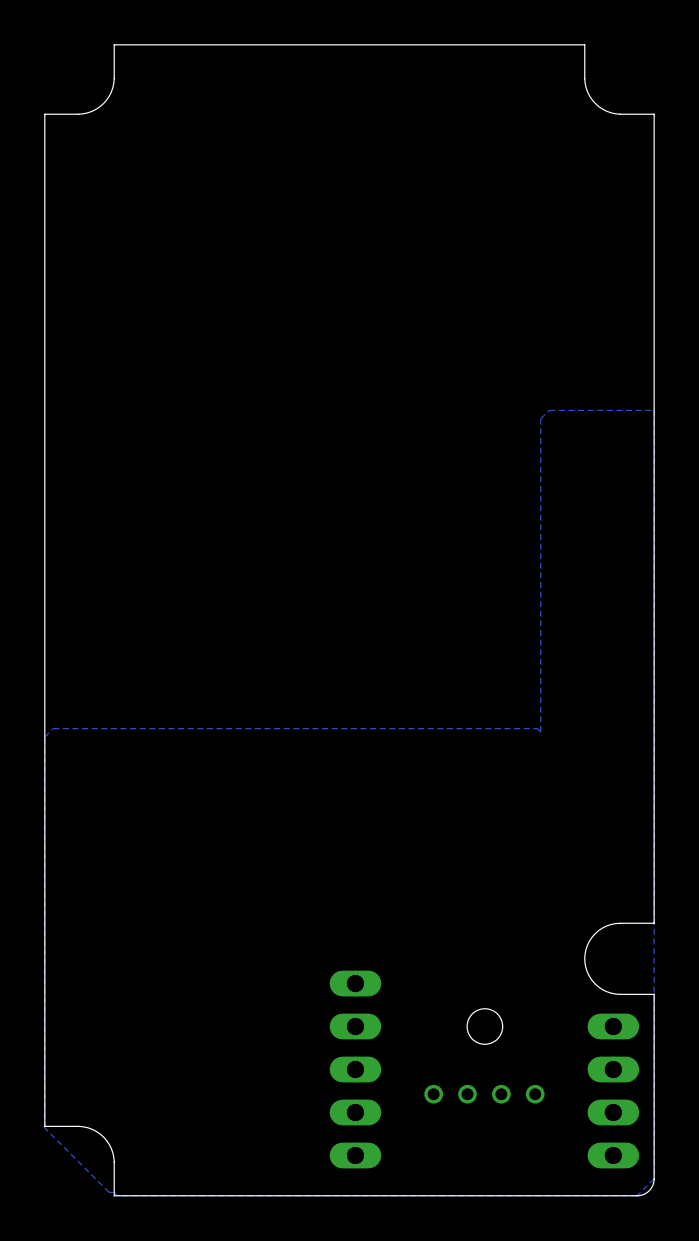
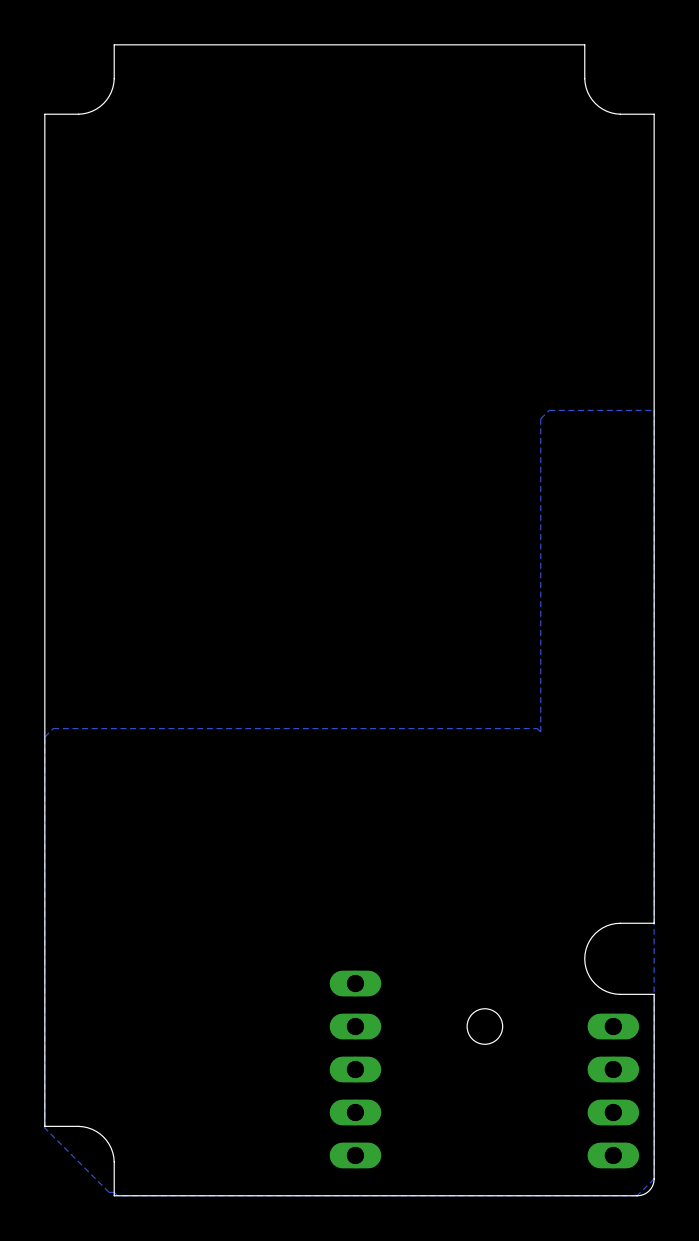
via: (433, 1094) -> none
via: (467, 1094) -> none
via: (501, 1094) -> none
via: (535, 1094) -> none

